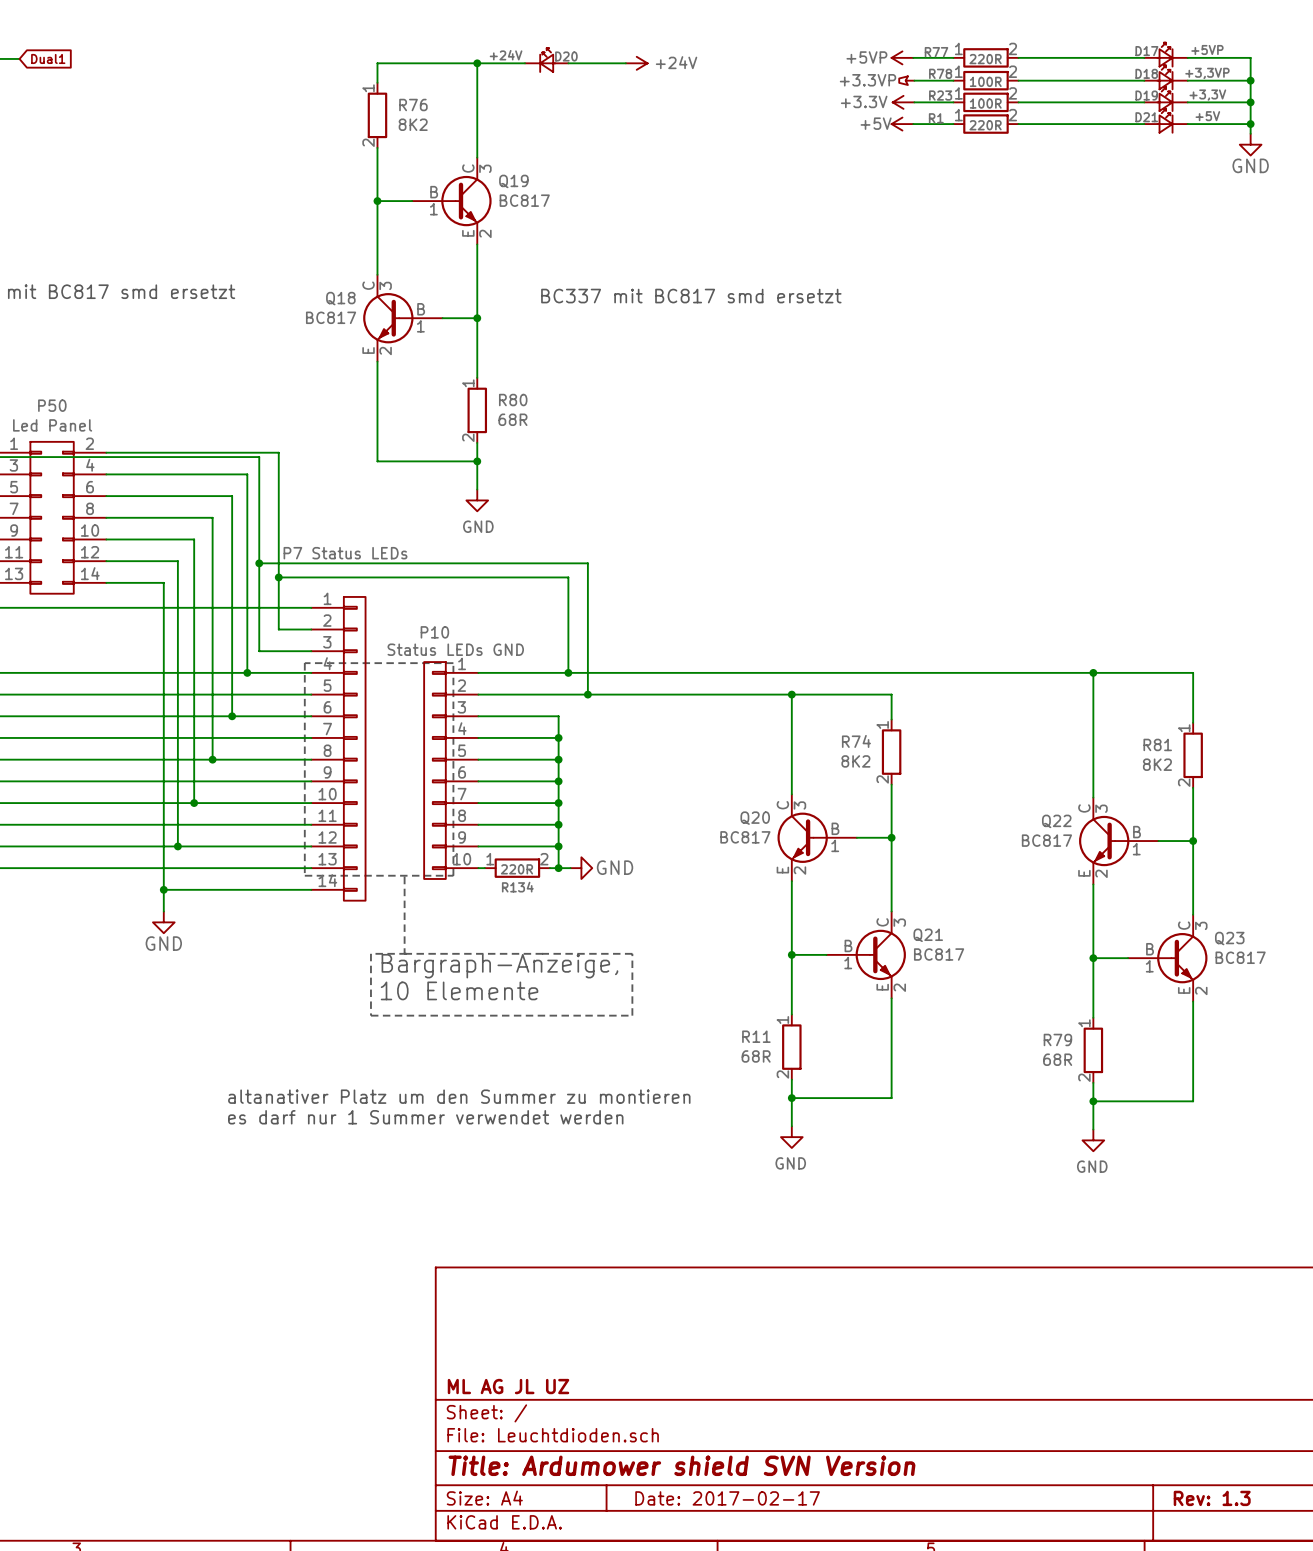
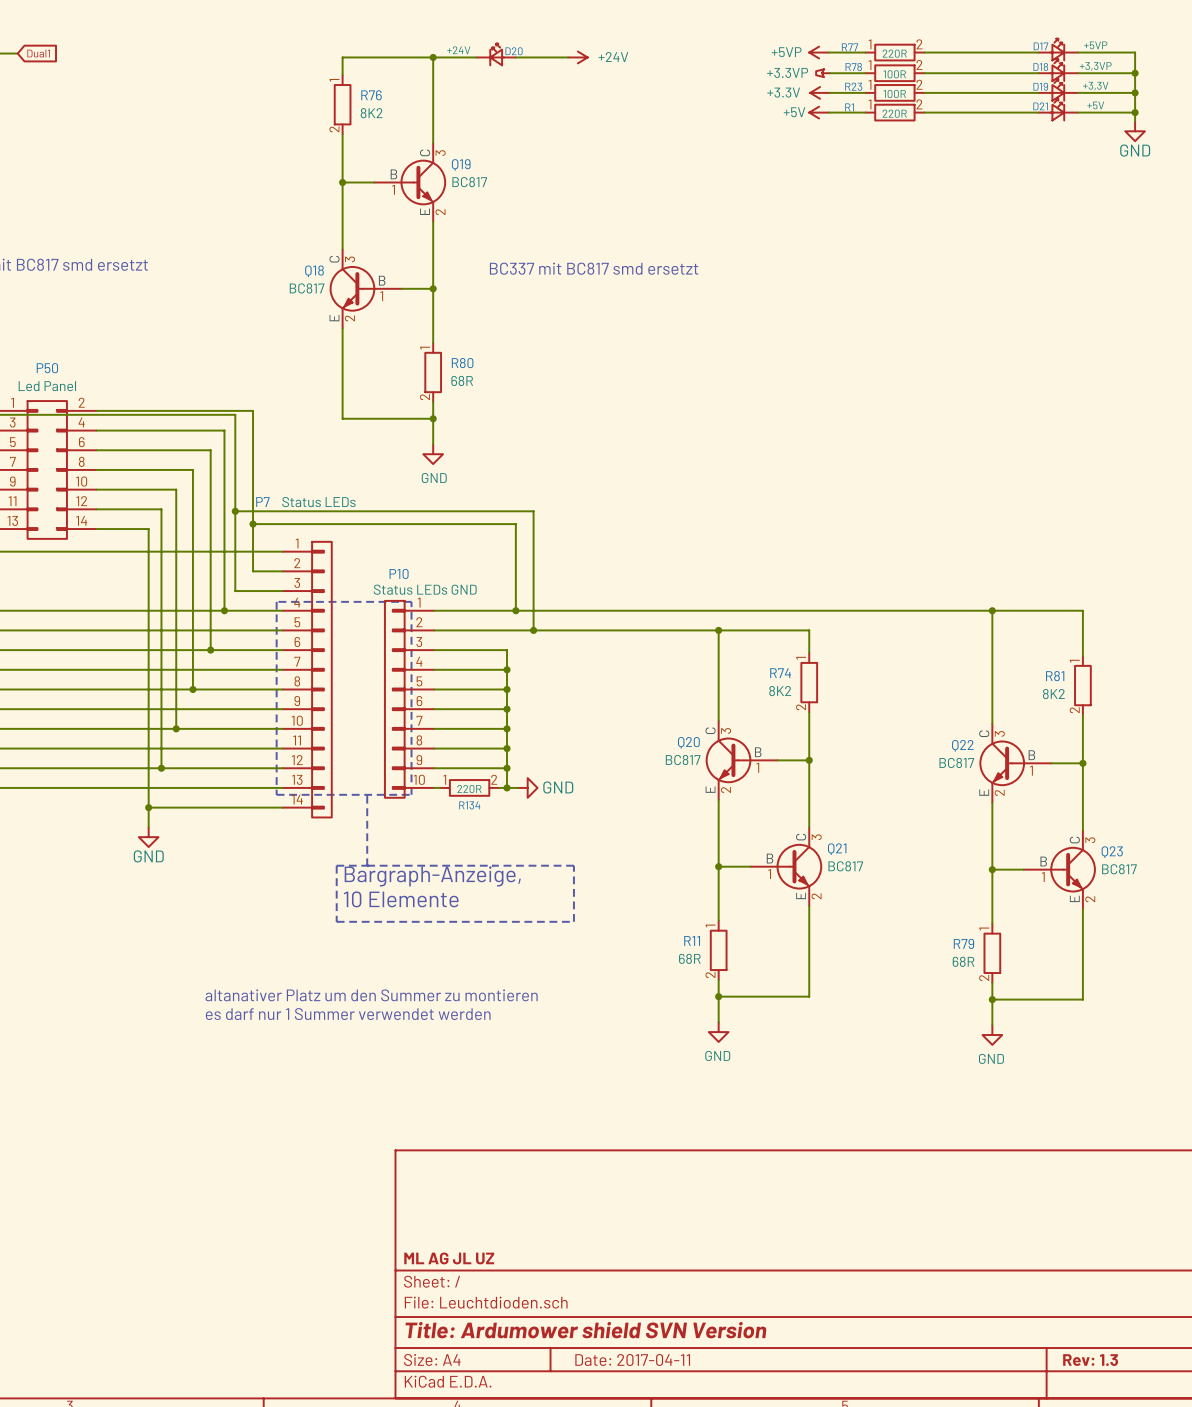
title block: Date: 2017-02-17 (727, 1498) -> Date: 2017-04-11 (632, 1360)

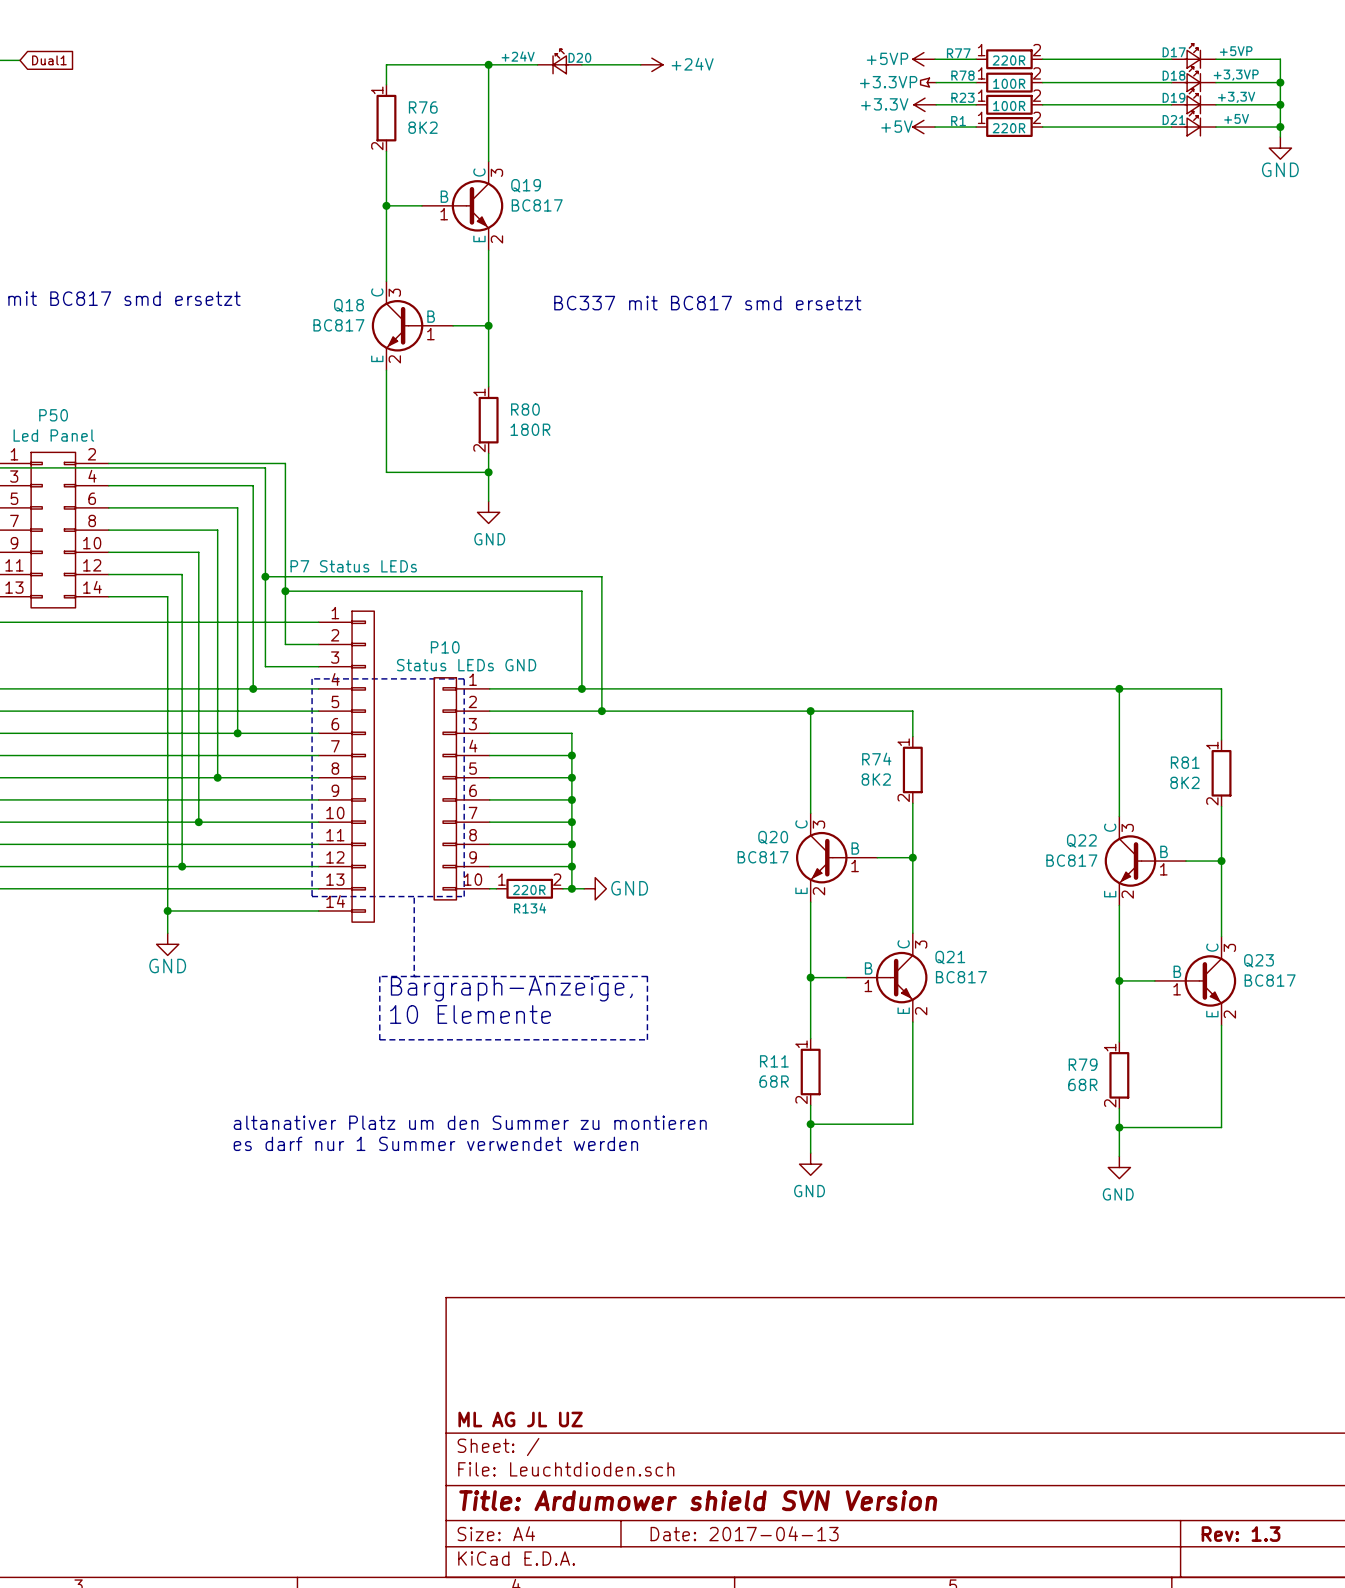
R80 value: 68R (462, 380) -> 180R (530, 429)
title block: Date: 2017-04-11 (632, 1360) -> Date: 2017-04-13 (744, 1533)

